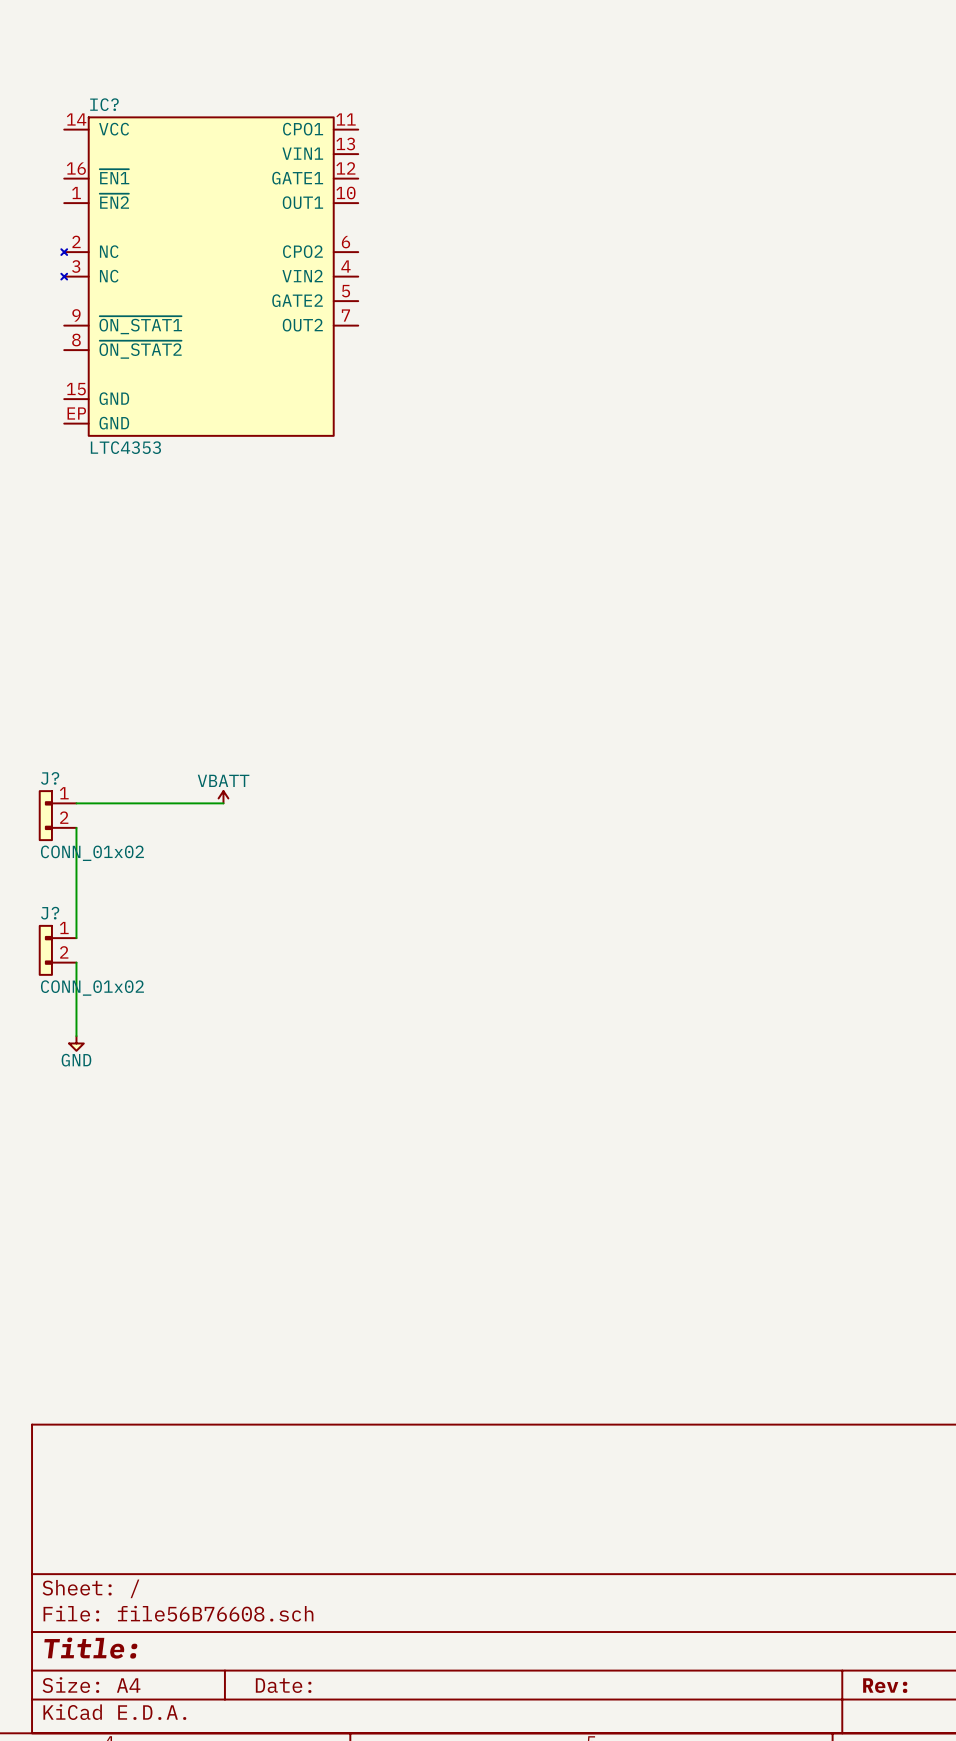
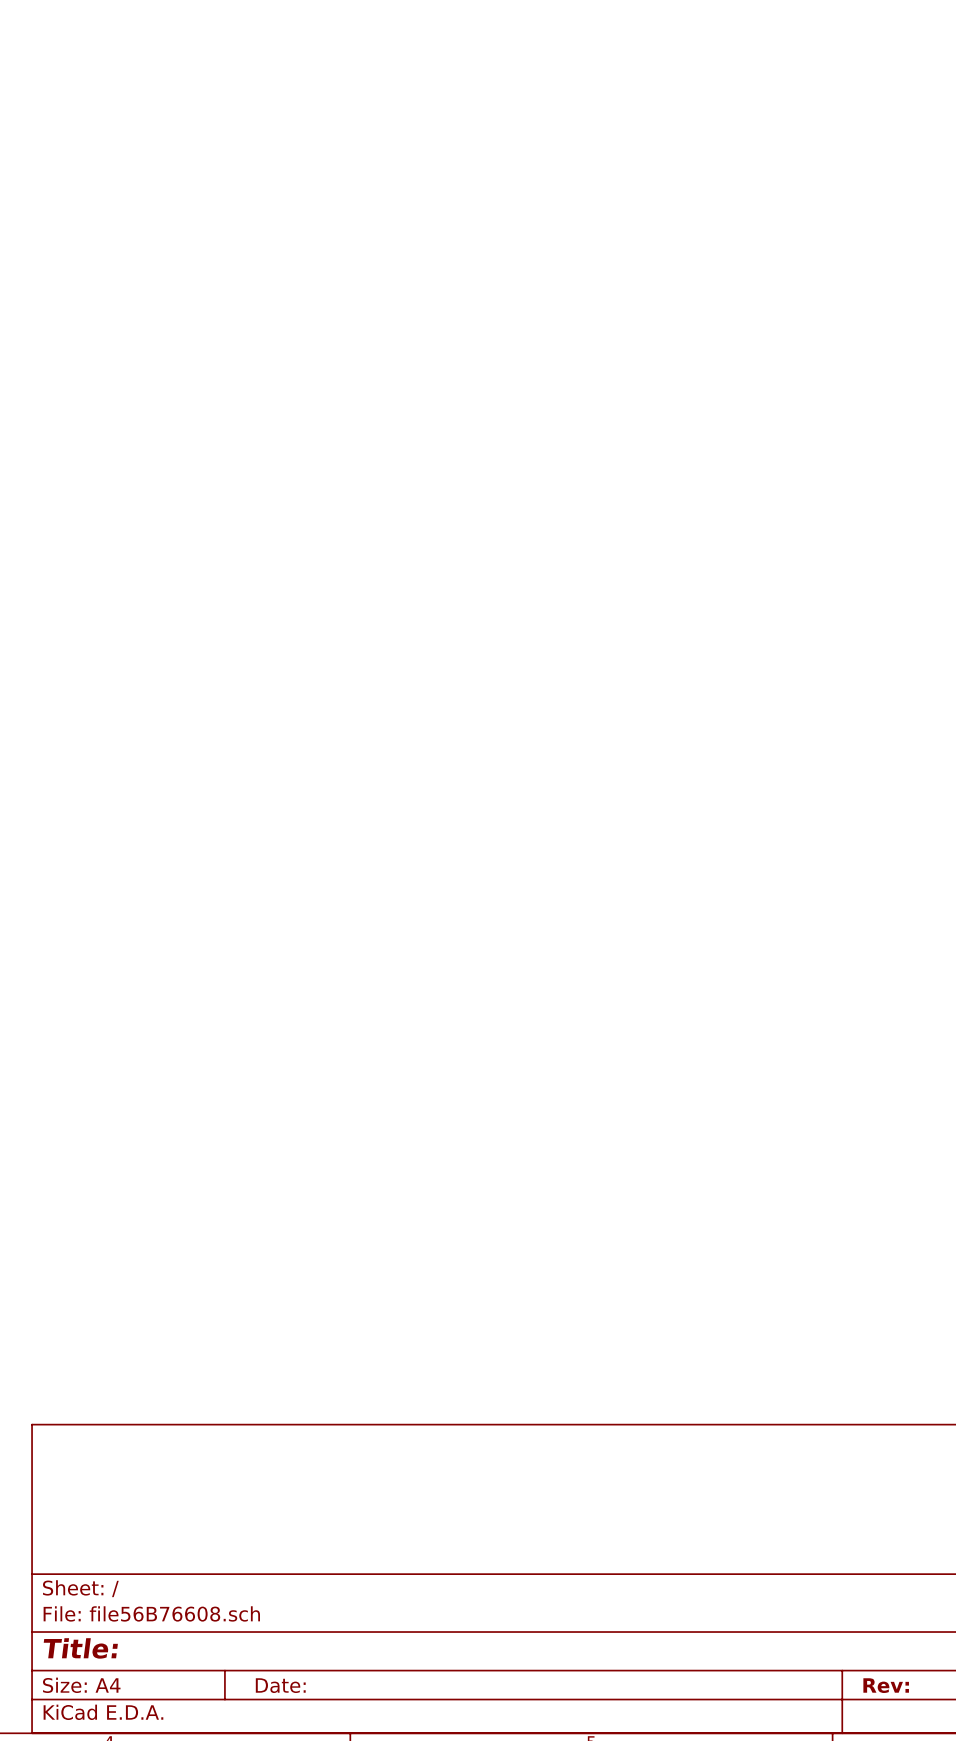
IC?: LTC4353 (209, 276) -> none
power symbol: VBATT (223, 797) -> none
wire: (76, 803) (223, 803) -> none
J?: CONN_01x02 (58, 815) -> none
wire: (76, 827) (76, 938) -> none
J?: CONN_01x02 (58, 950) -> none
wire: (76, 962) (76, 1036) -> none
power symbol: GND (76, 1043) -> none

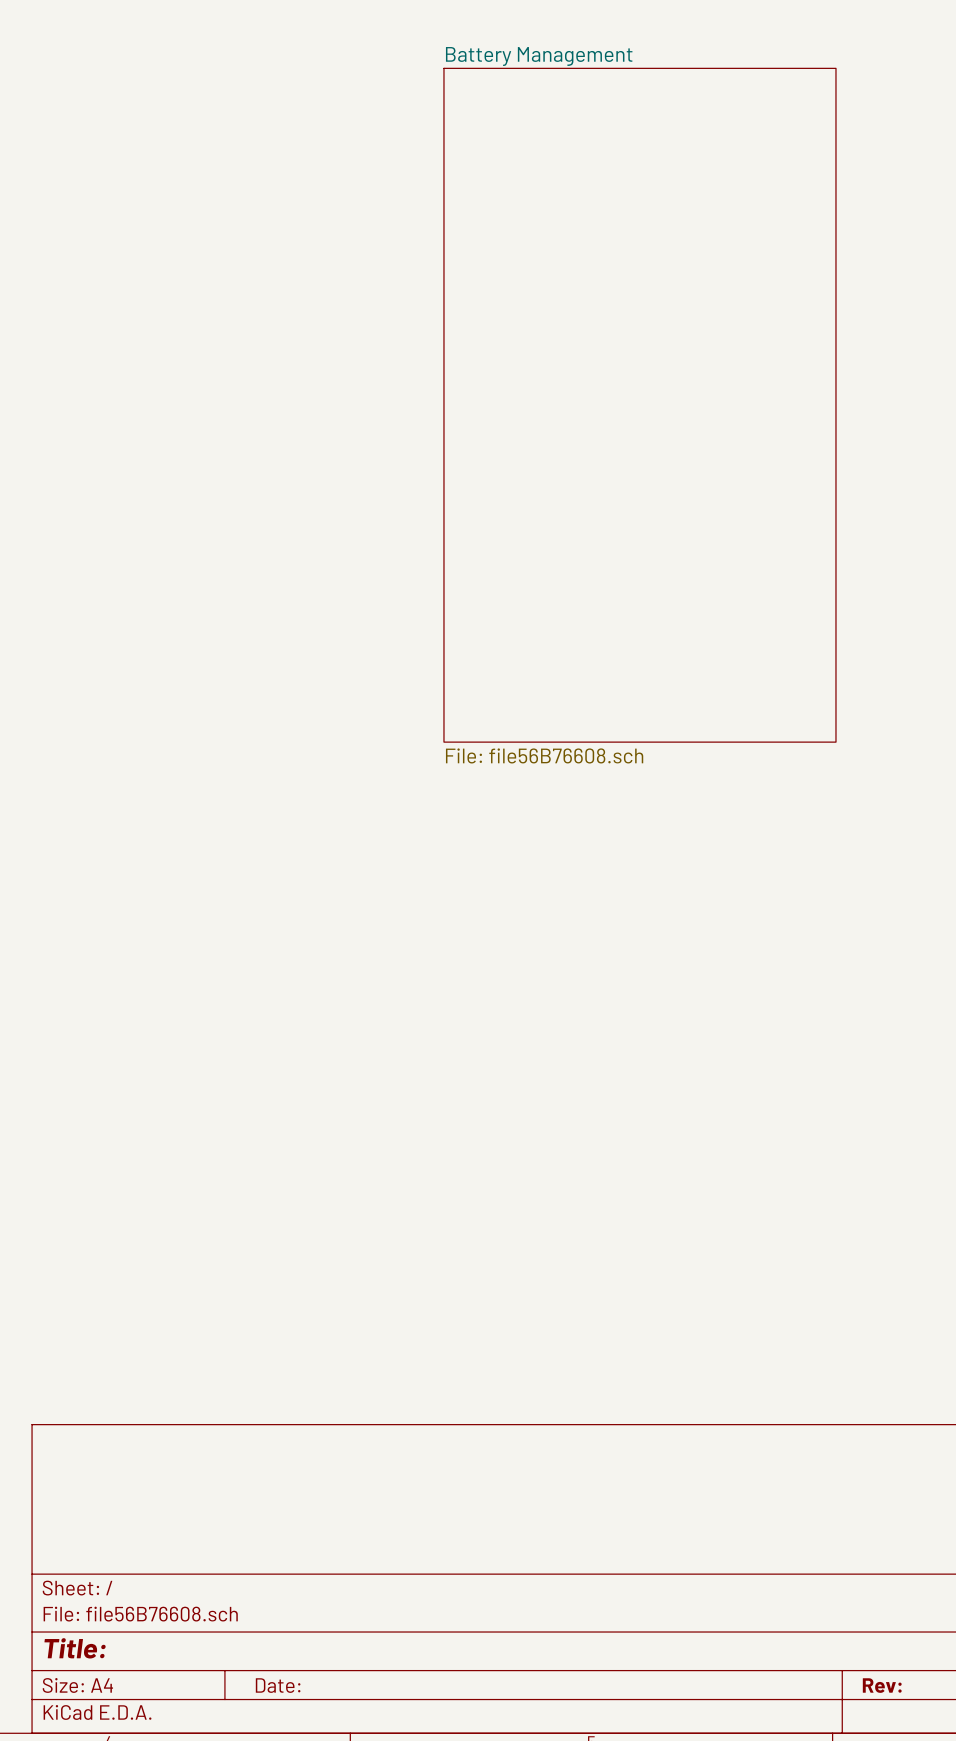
sheet Battery Management: none -> File: file56B76608.sch (639, 405)

